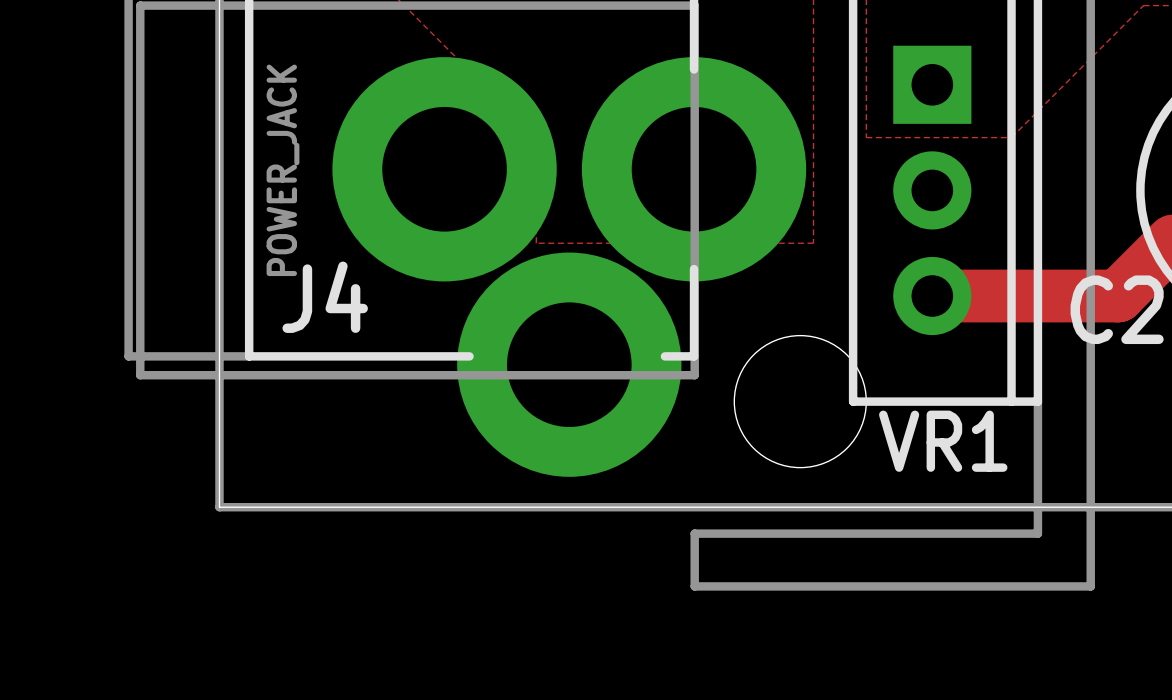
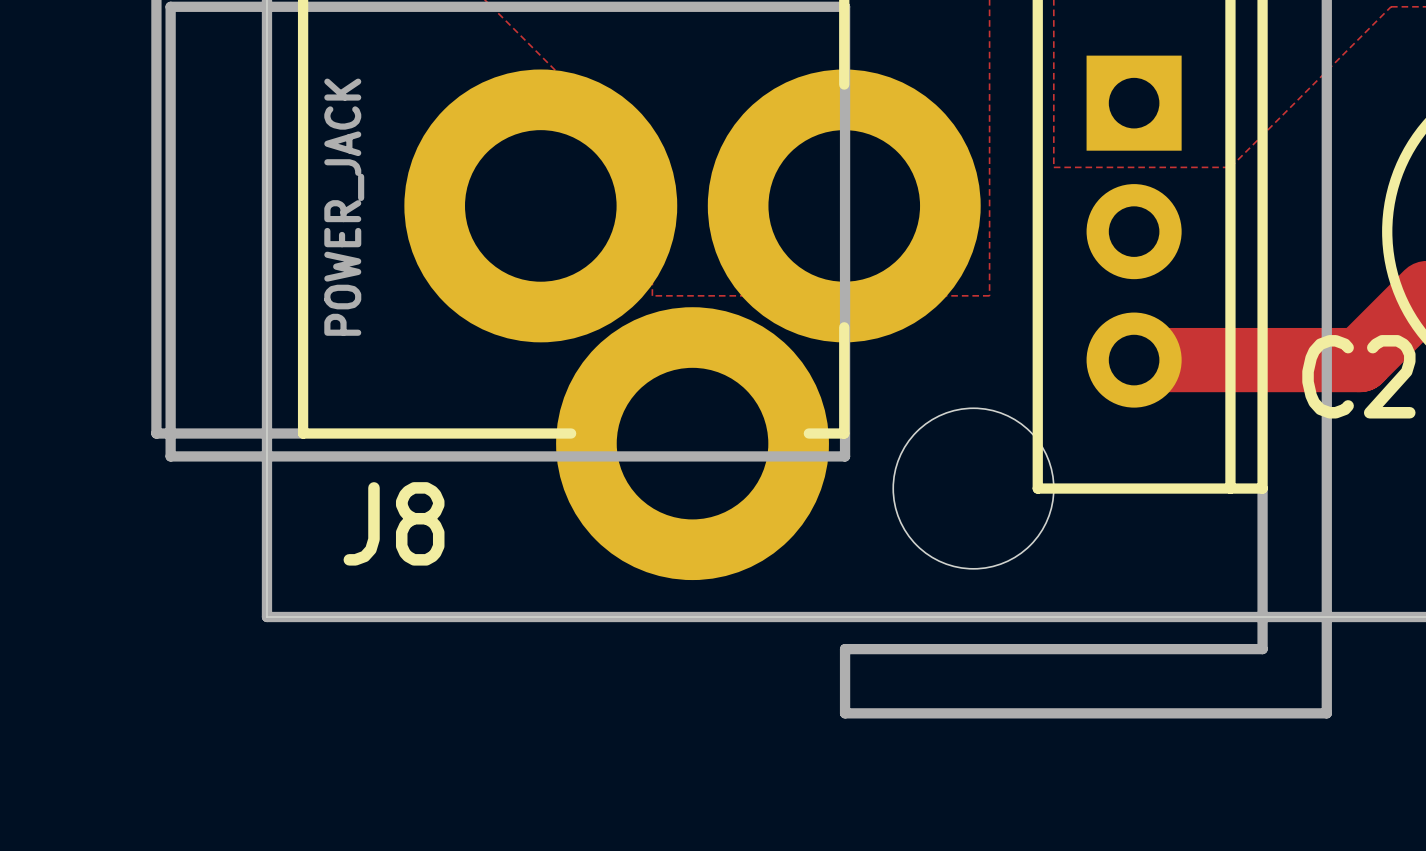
J4 name: J4 (325, 297) -> J8 (394, 523)
text: VR1 (943, 441) -> none

